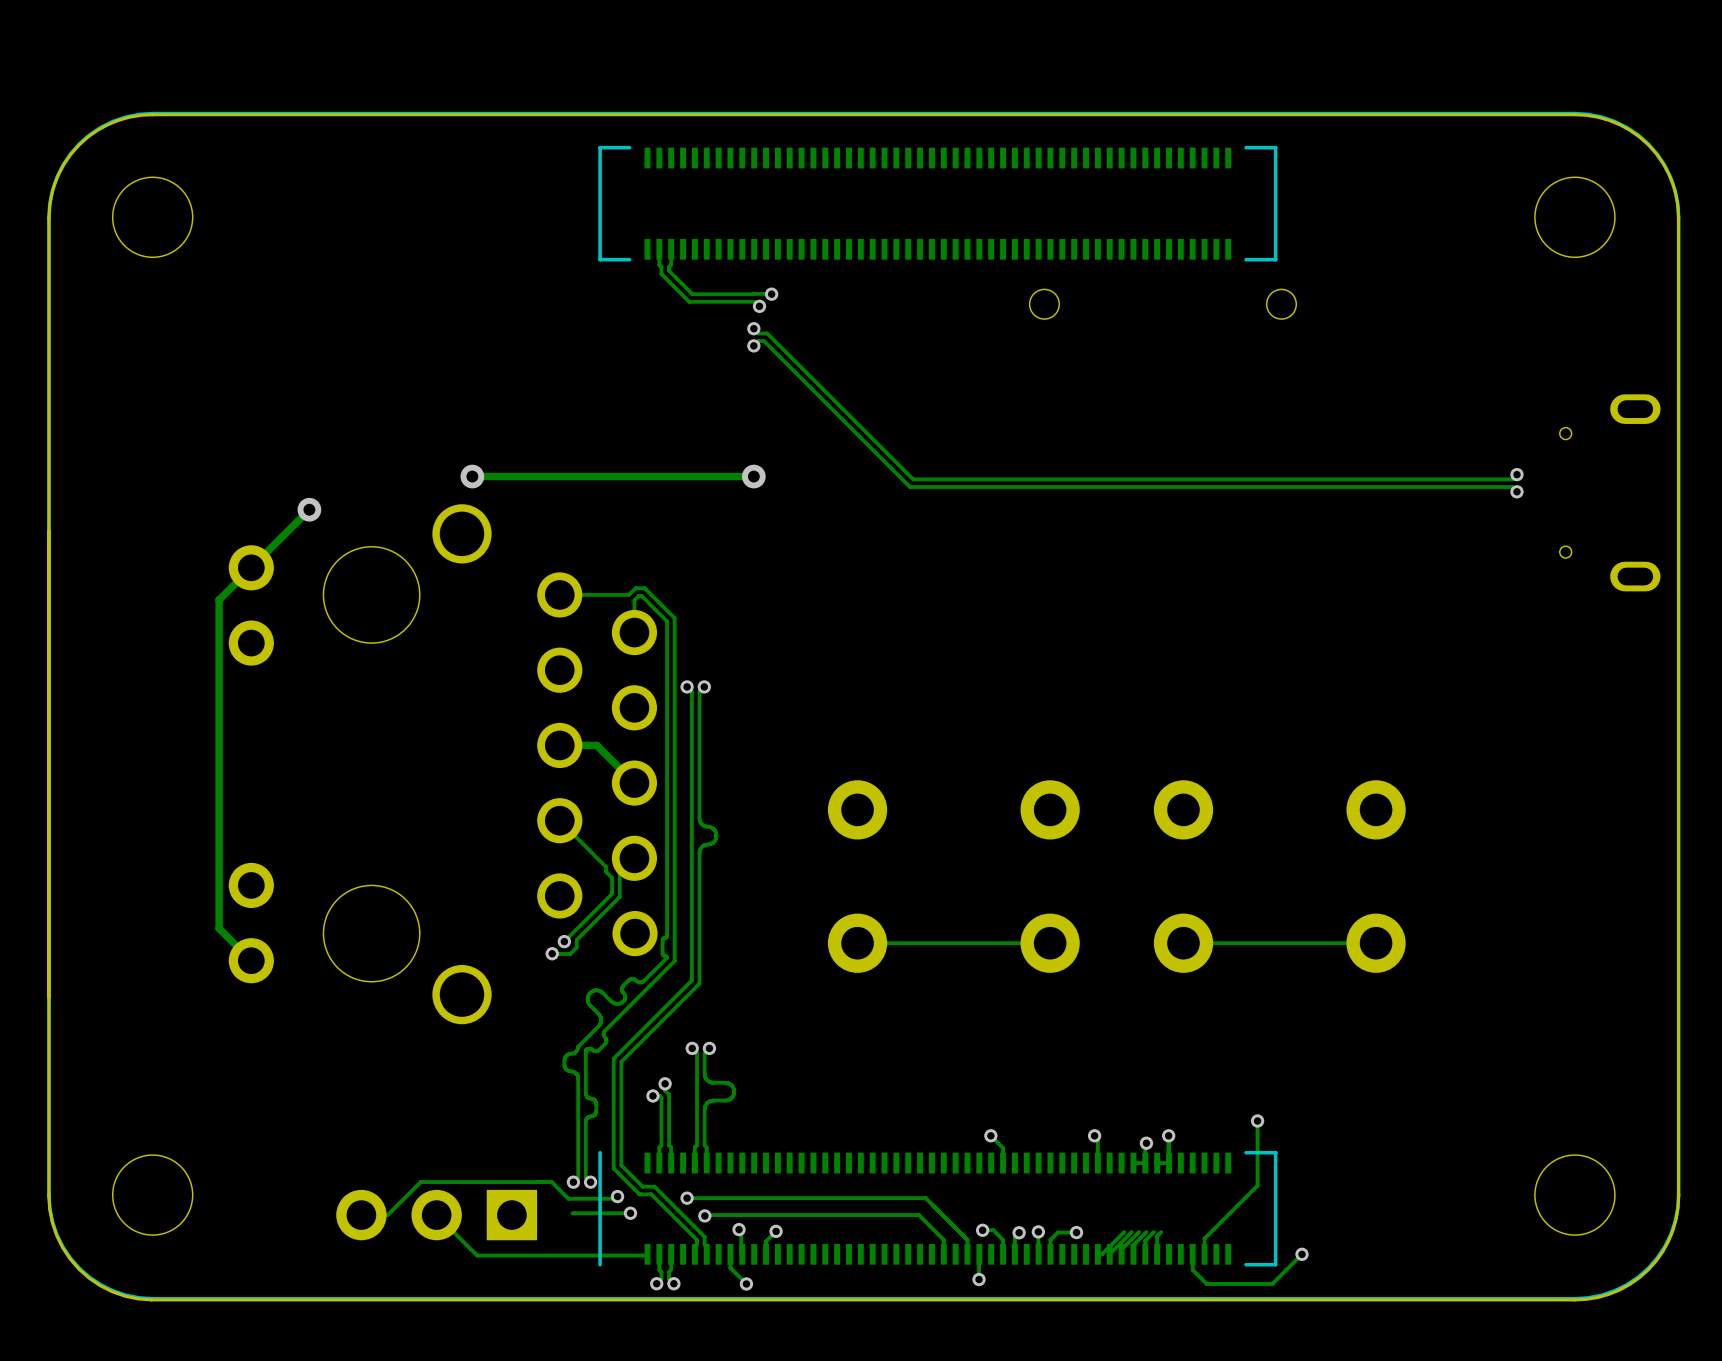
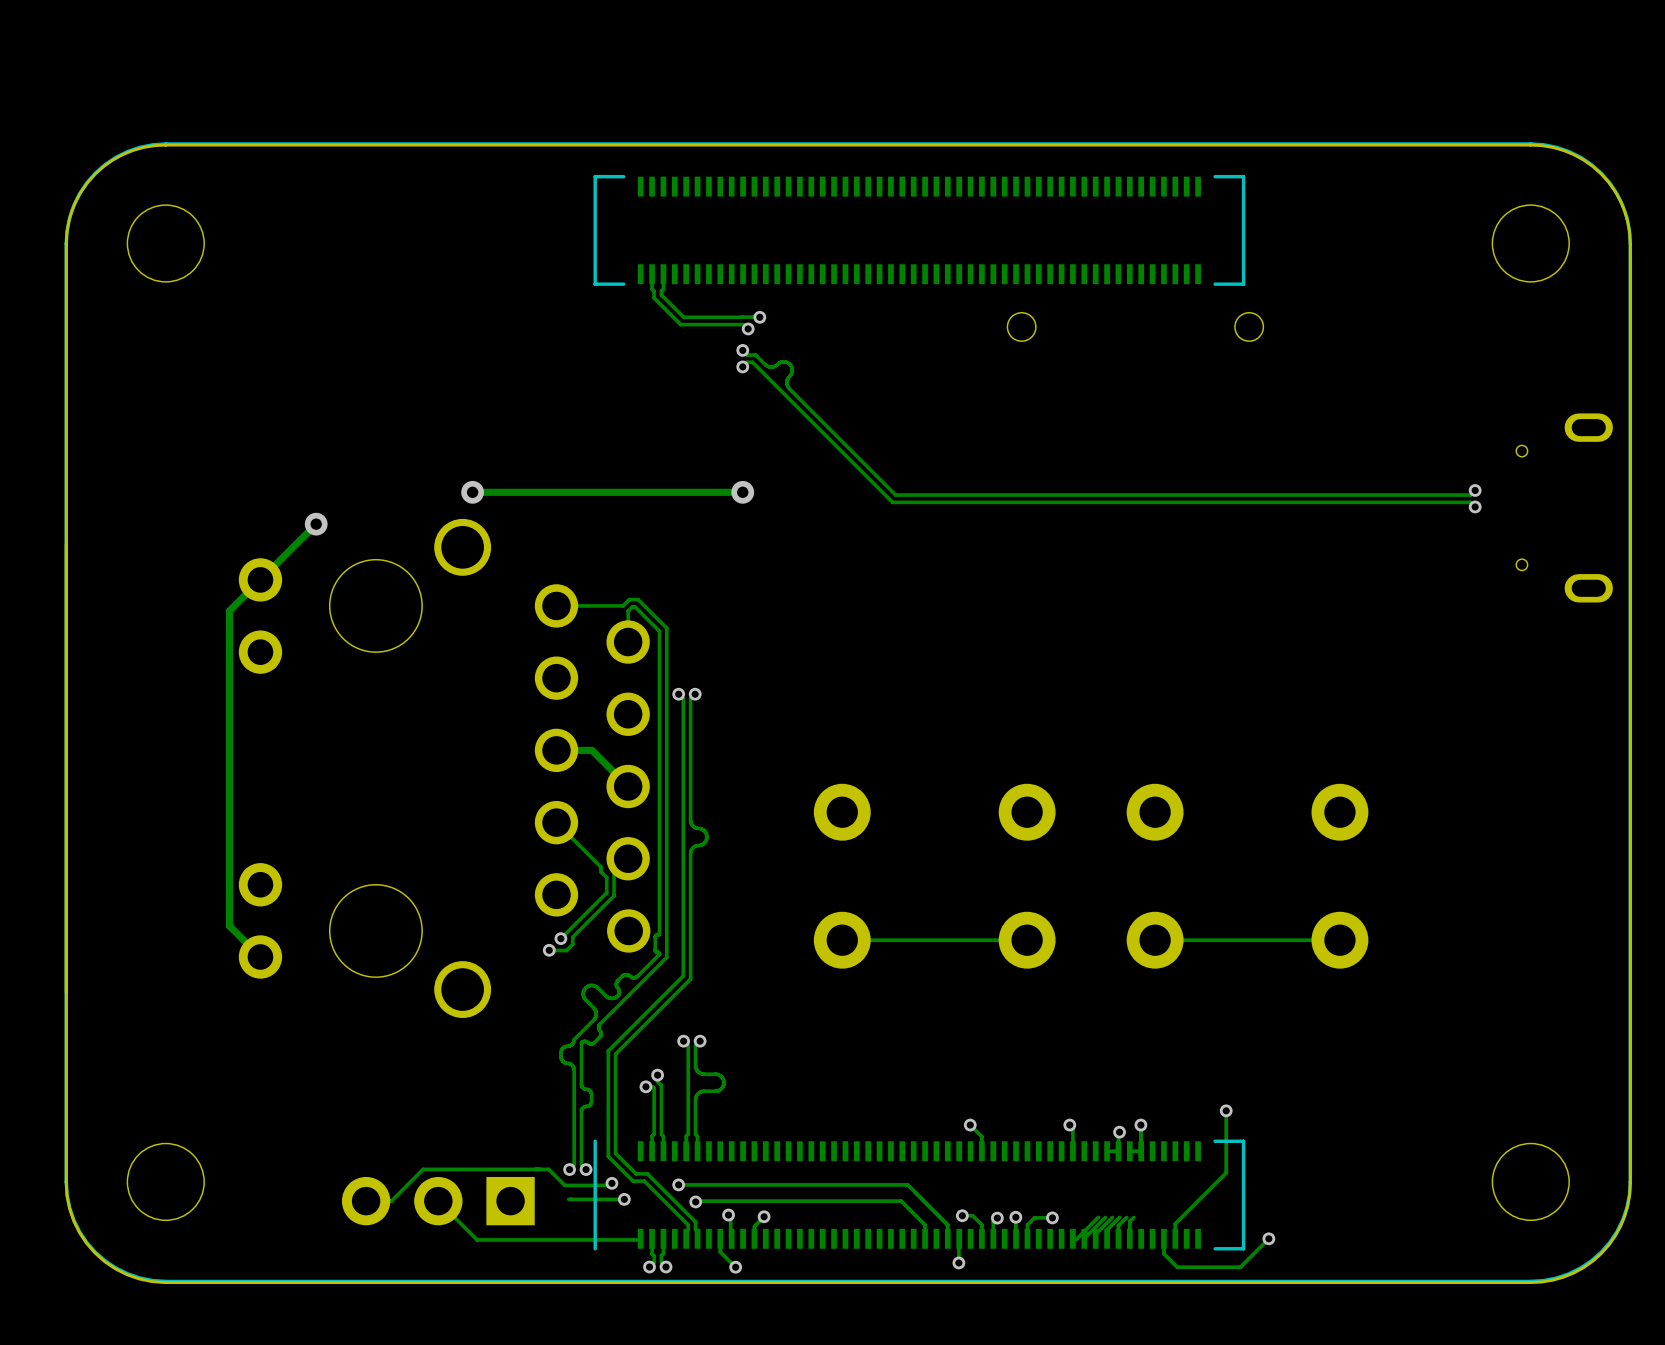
track: (777, 343) (802, 368) -> (765, 364) (772, 367) (782, 361) (789, 364) (792, 371) (786, 381) (789, 388)

